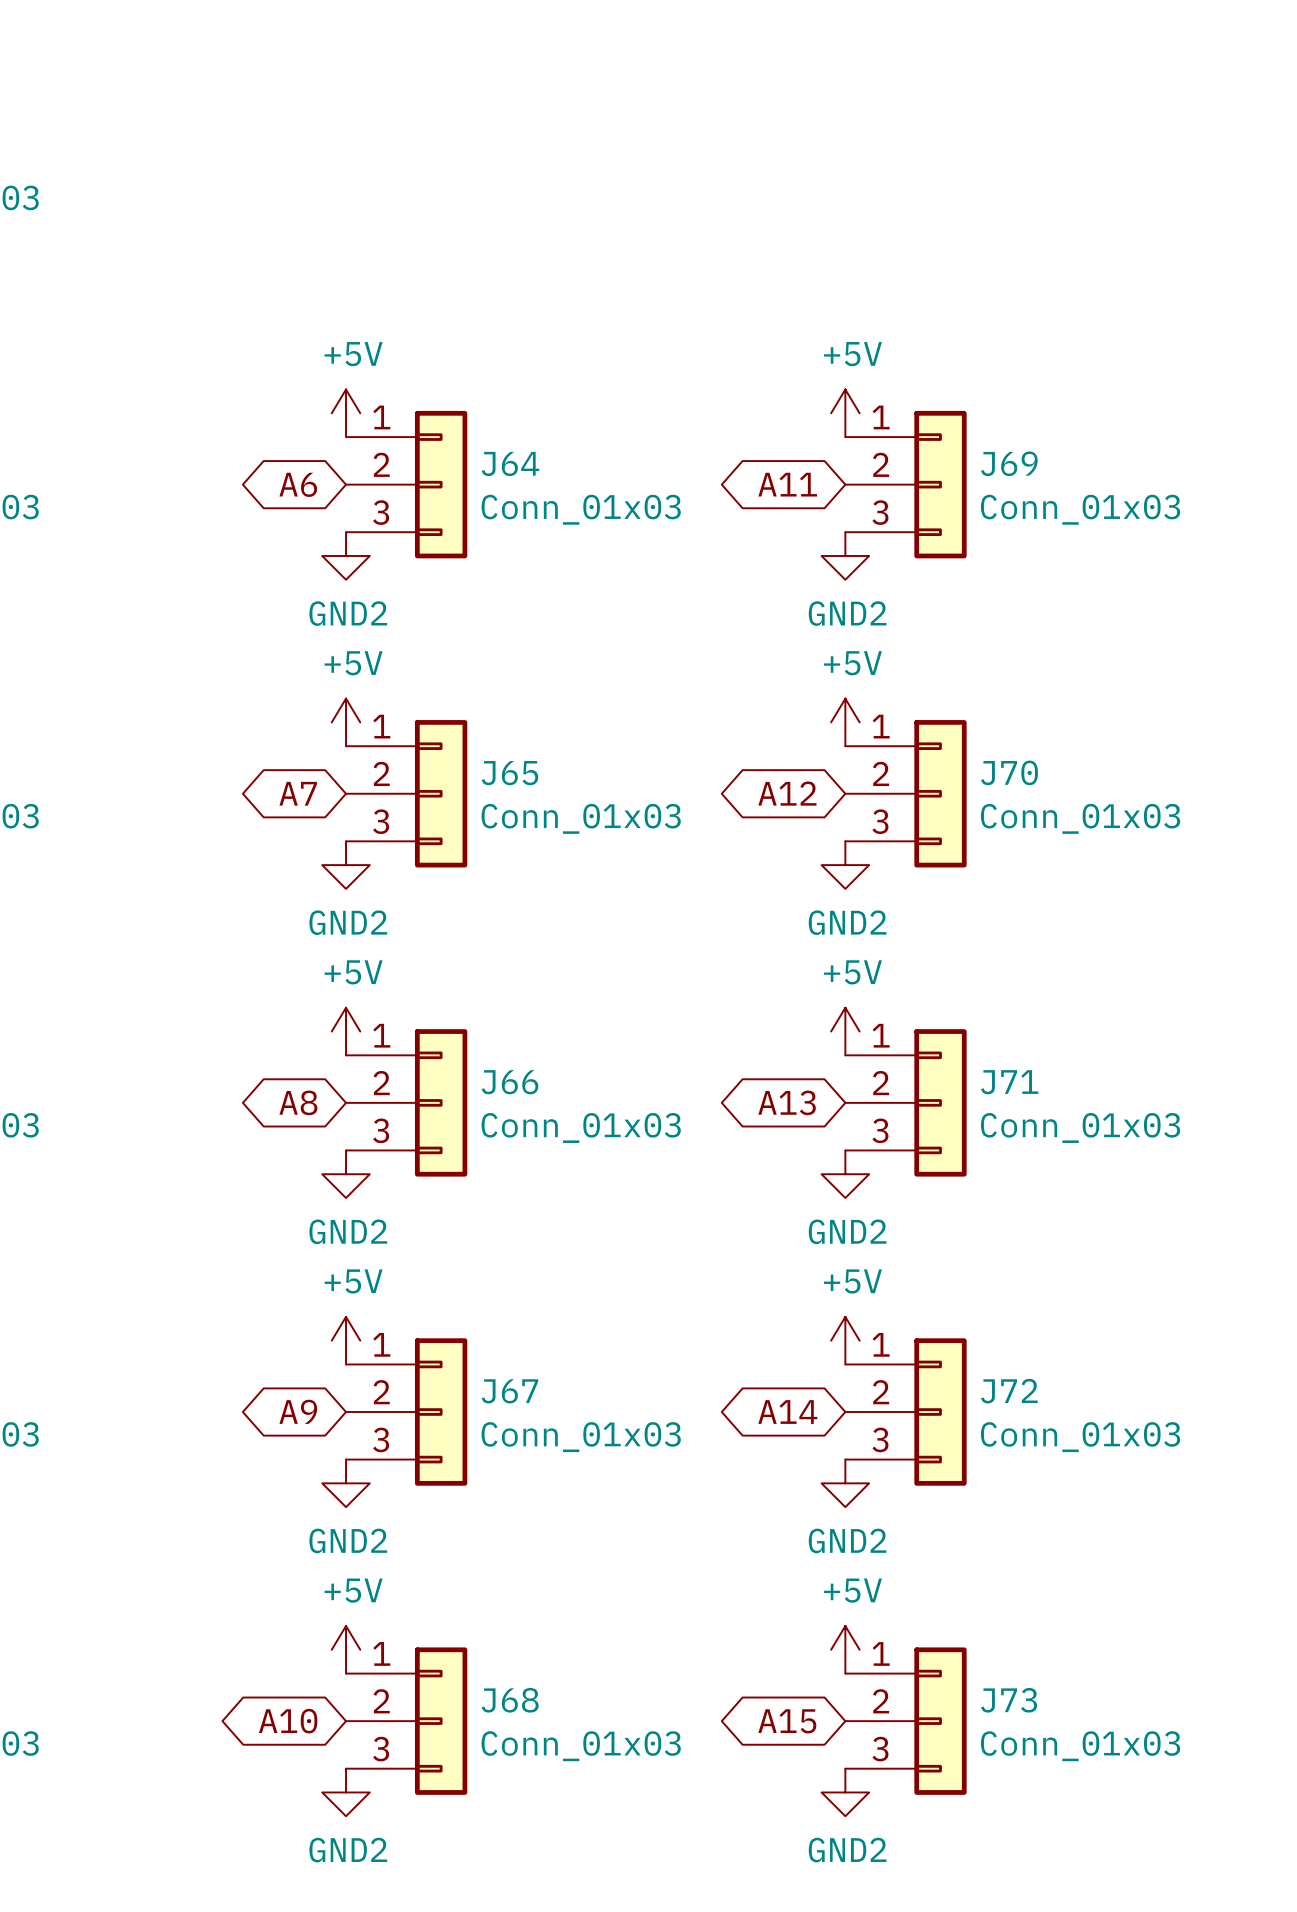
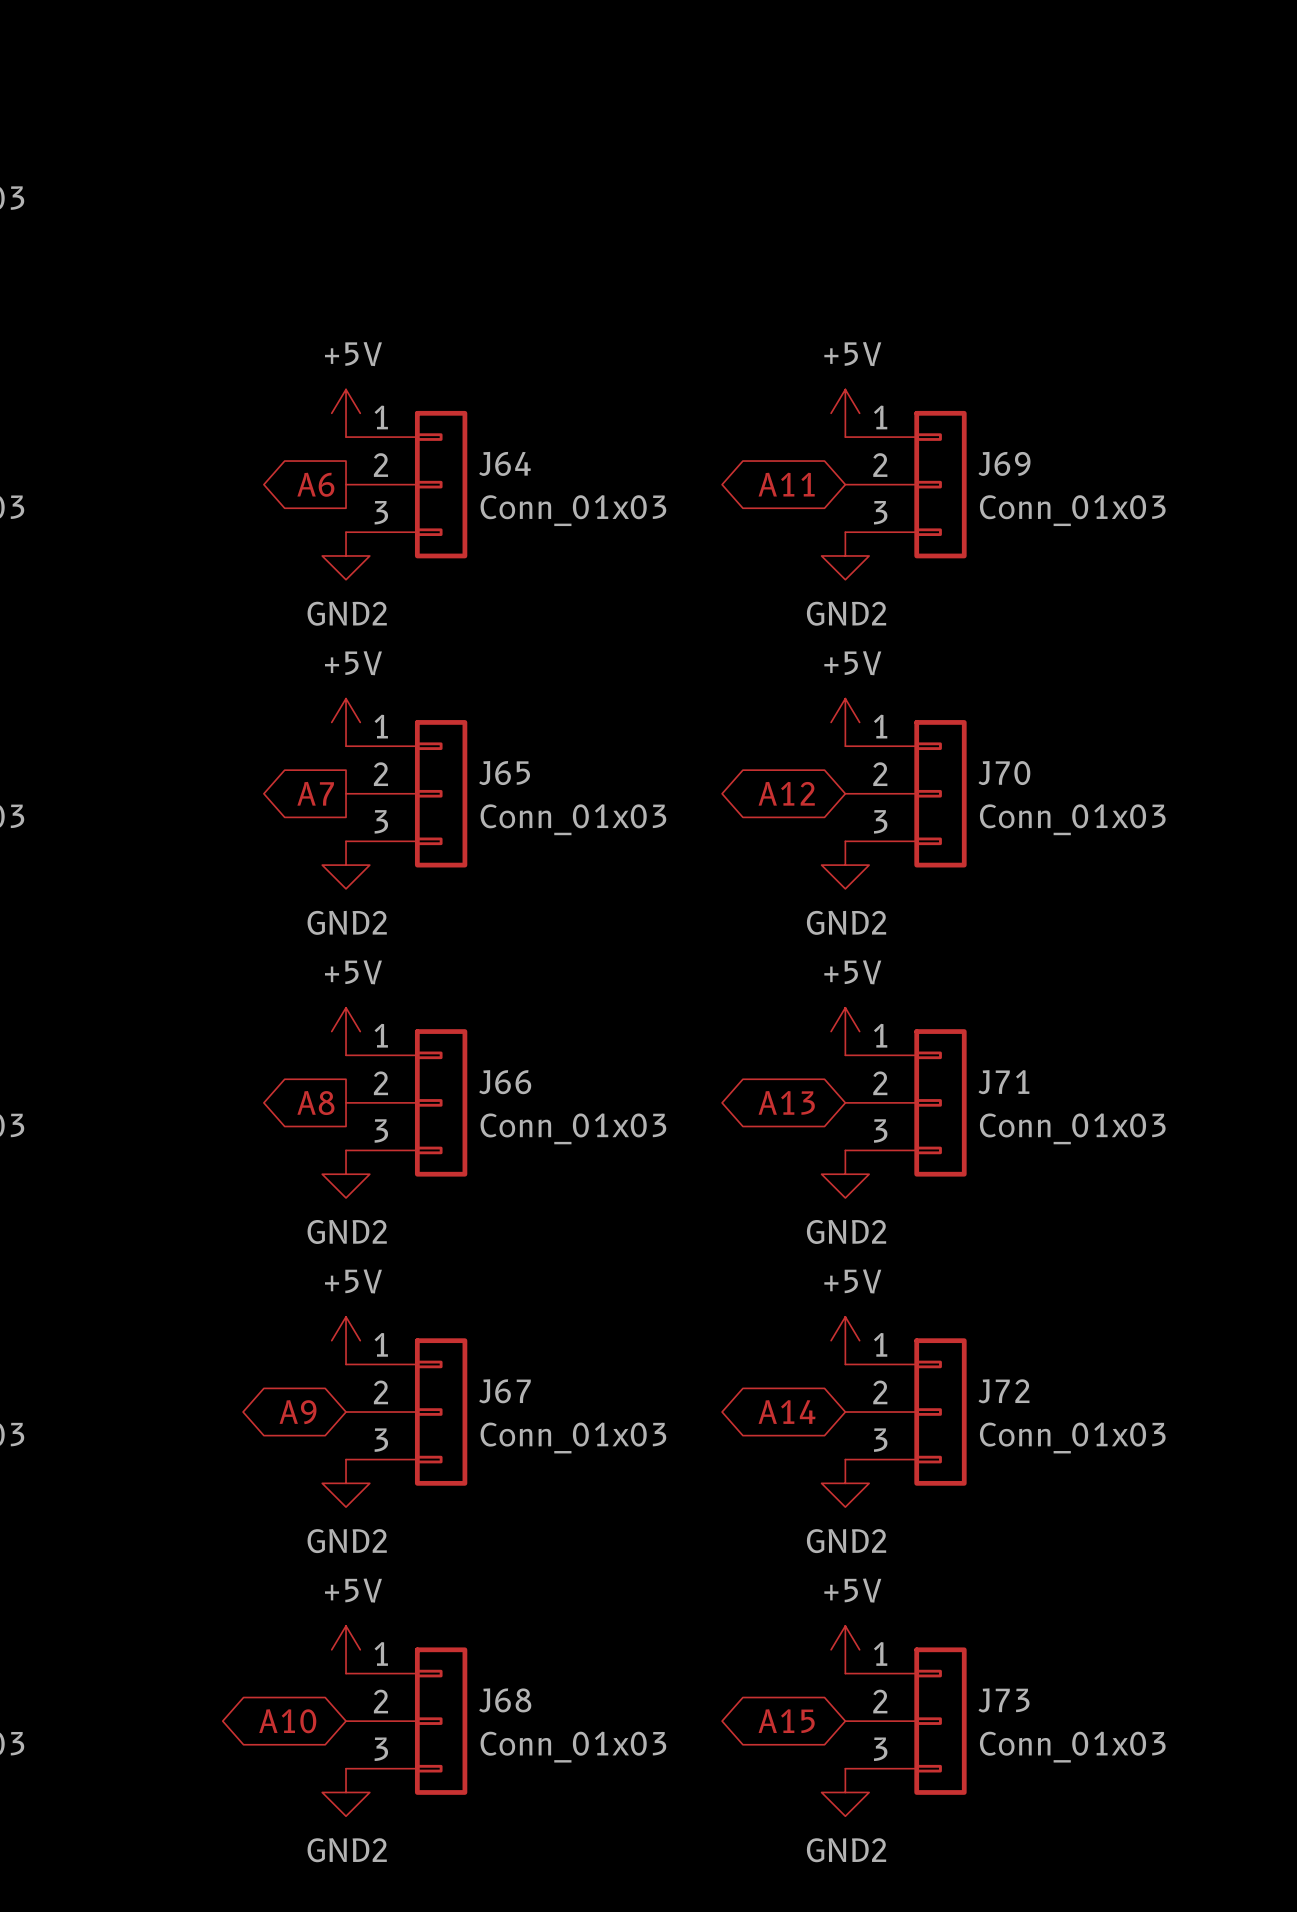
global label shape: bidirectional (298, 484) -> output (315, 484)
global label shape: bidirectional (298, 793) -> output (315, 793)
global label shape: bidirectional (298, 1102) -> output (315, 1103)

